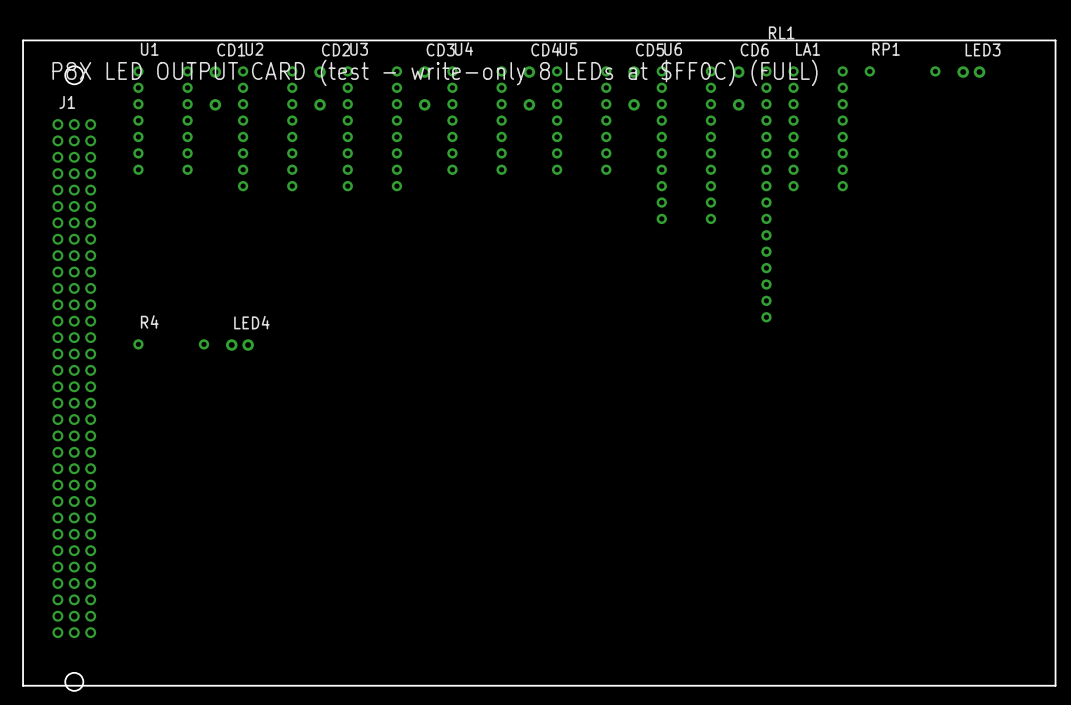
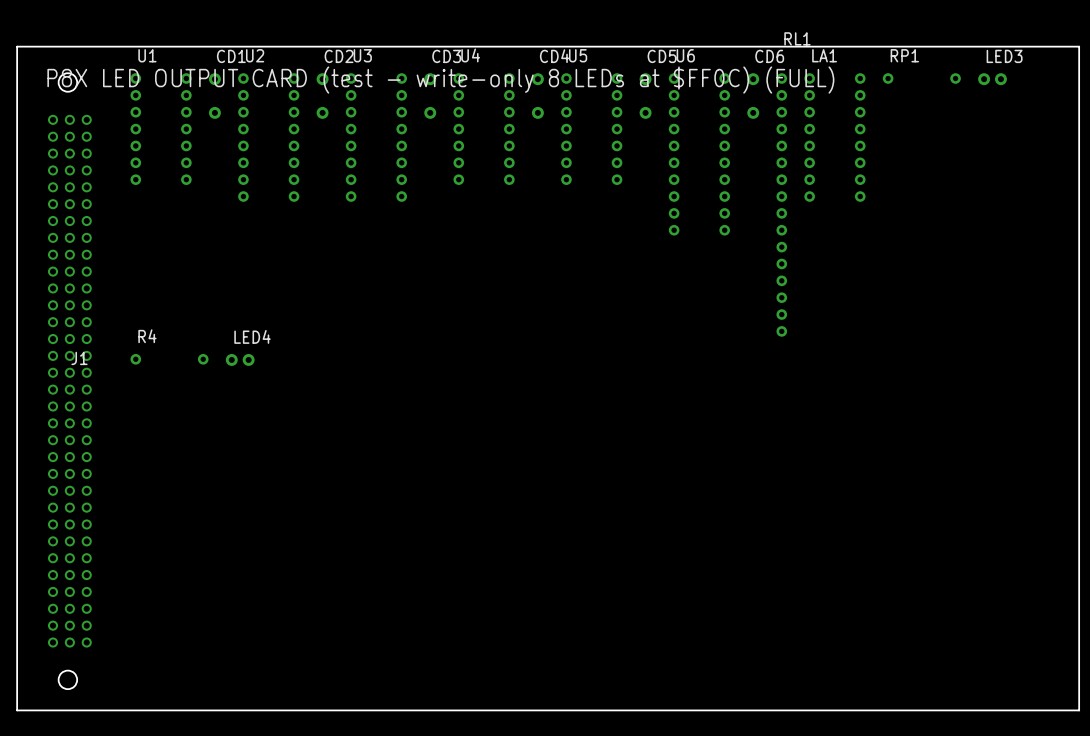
J1 footprint: [52, 66, 97, 691] -> [47, 73, 92, 690]
J1 name position: J1 (67, 102) -> J1 (79, 358)

